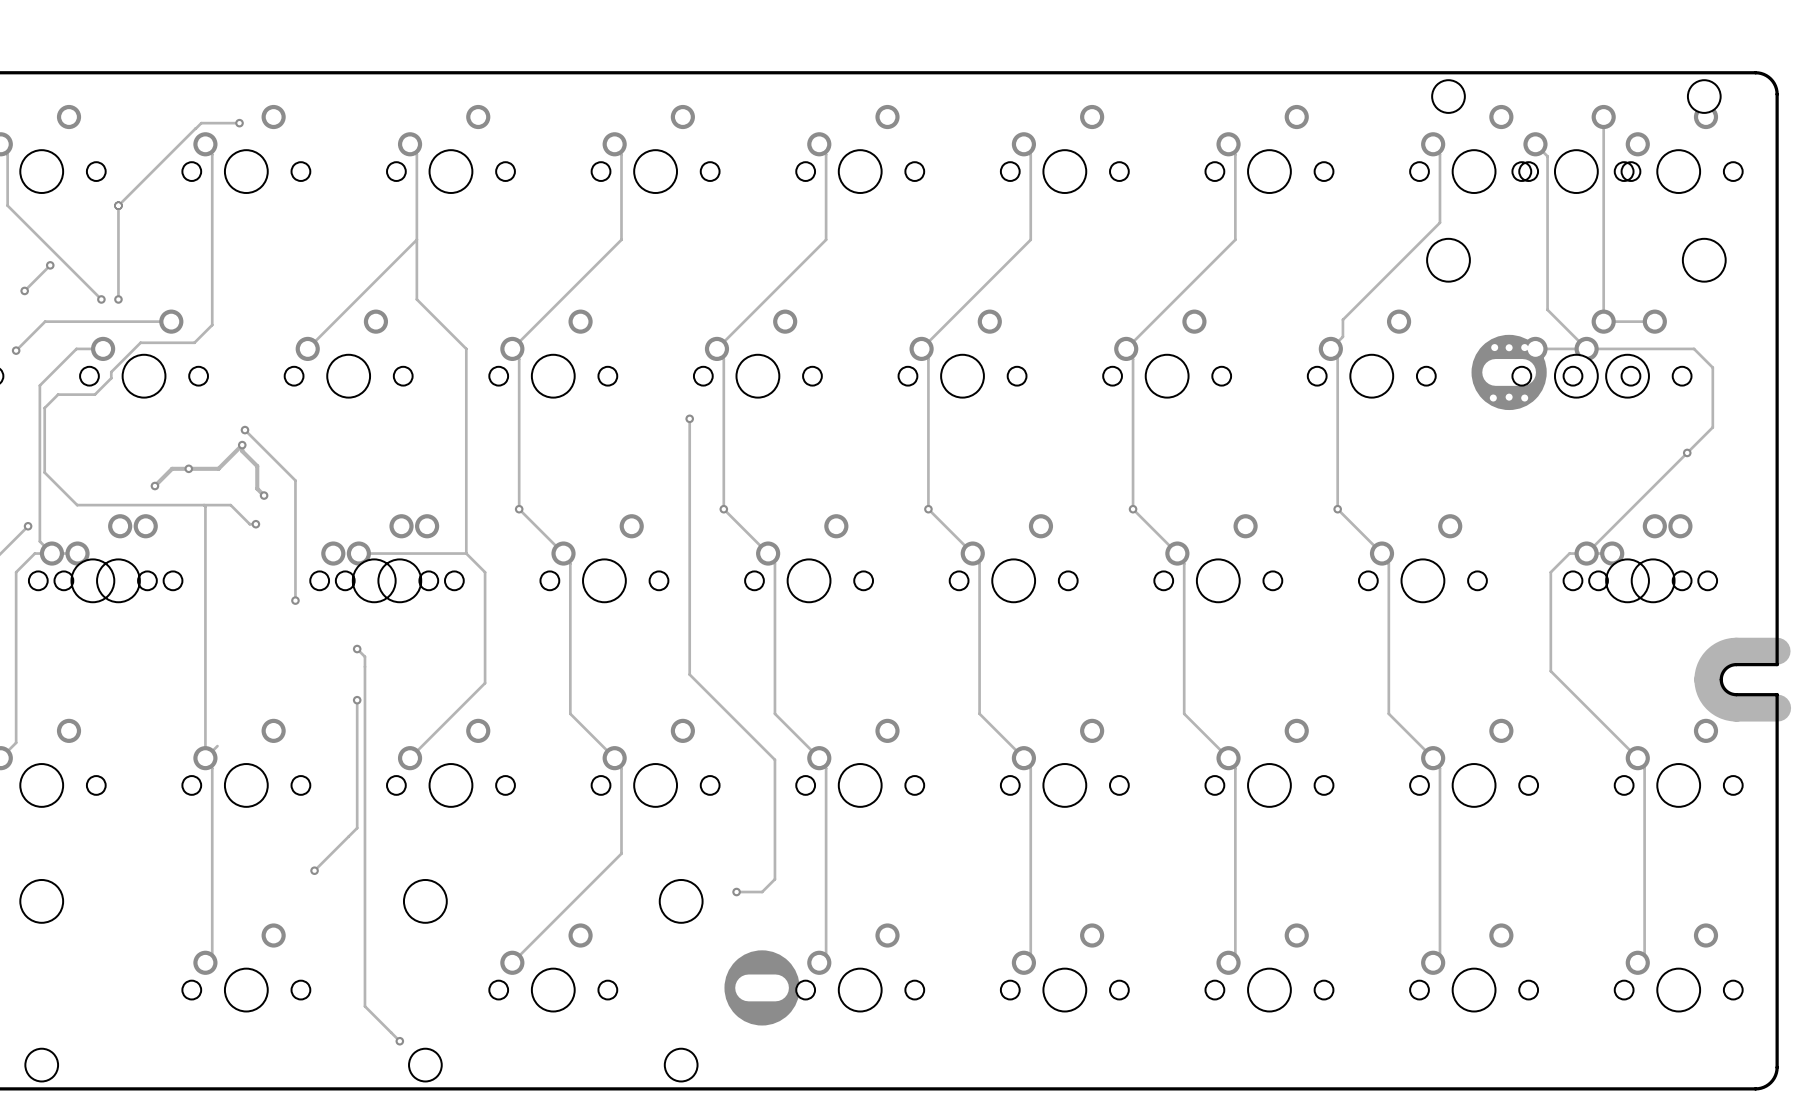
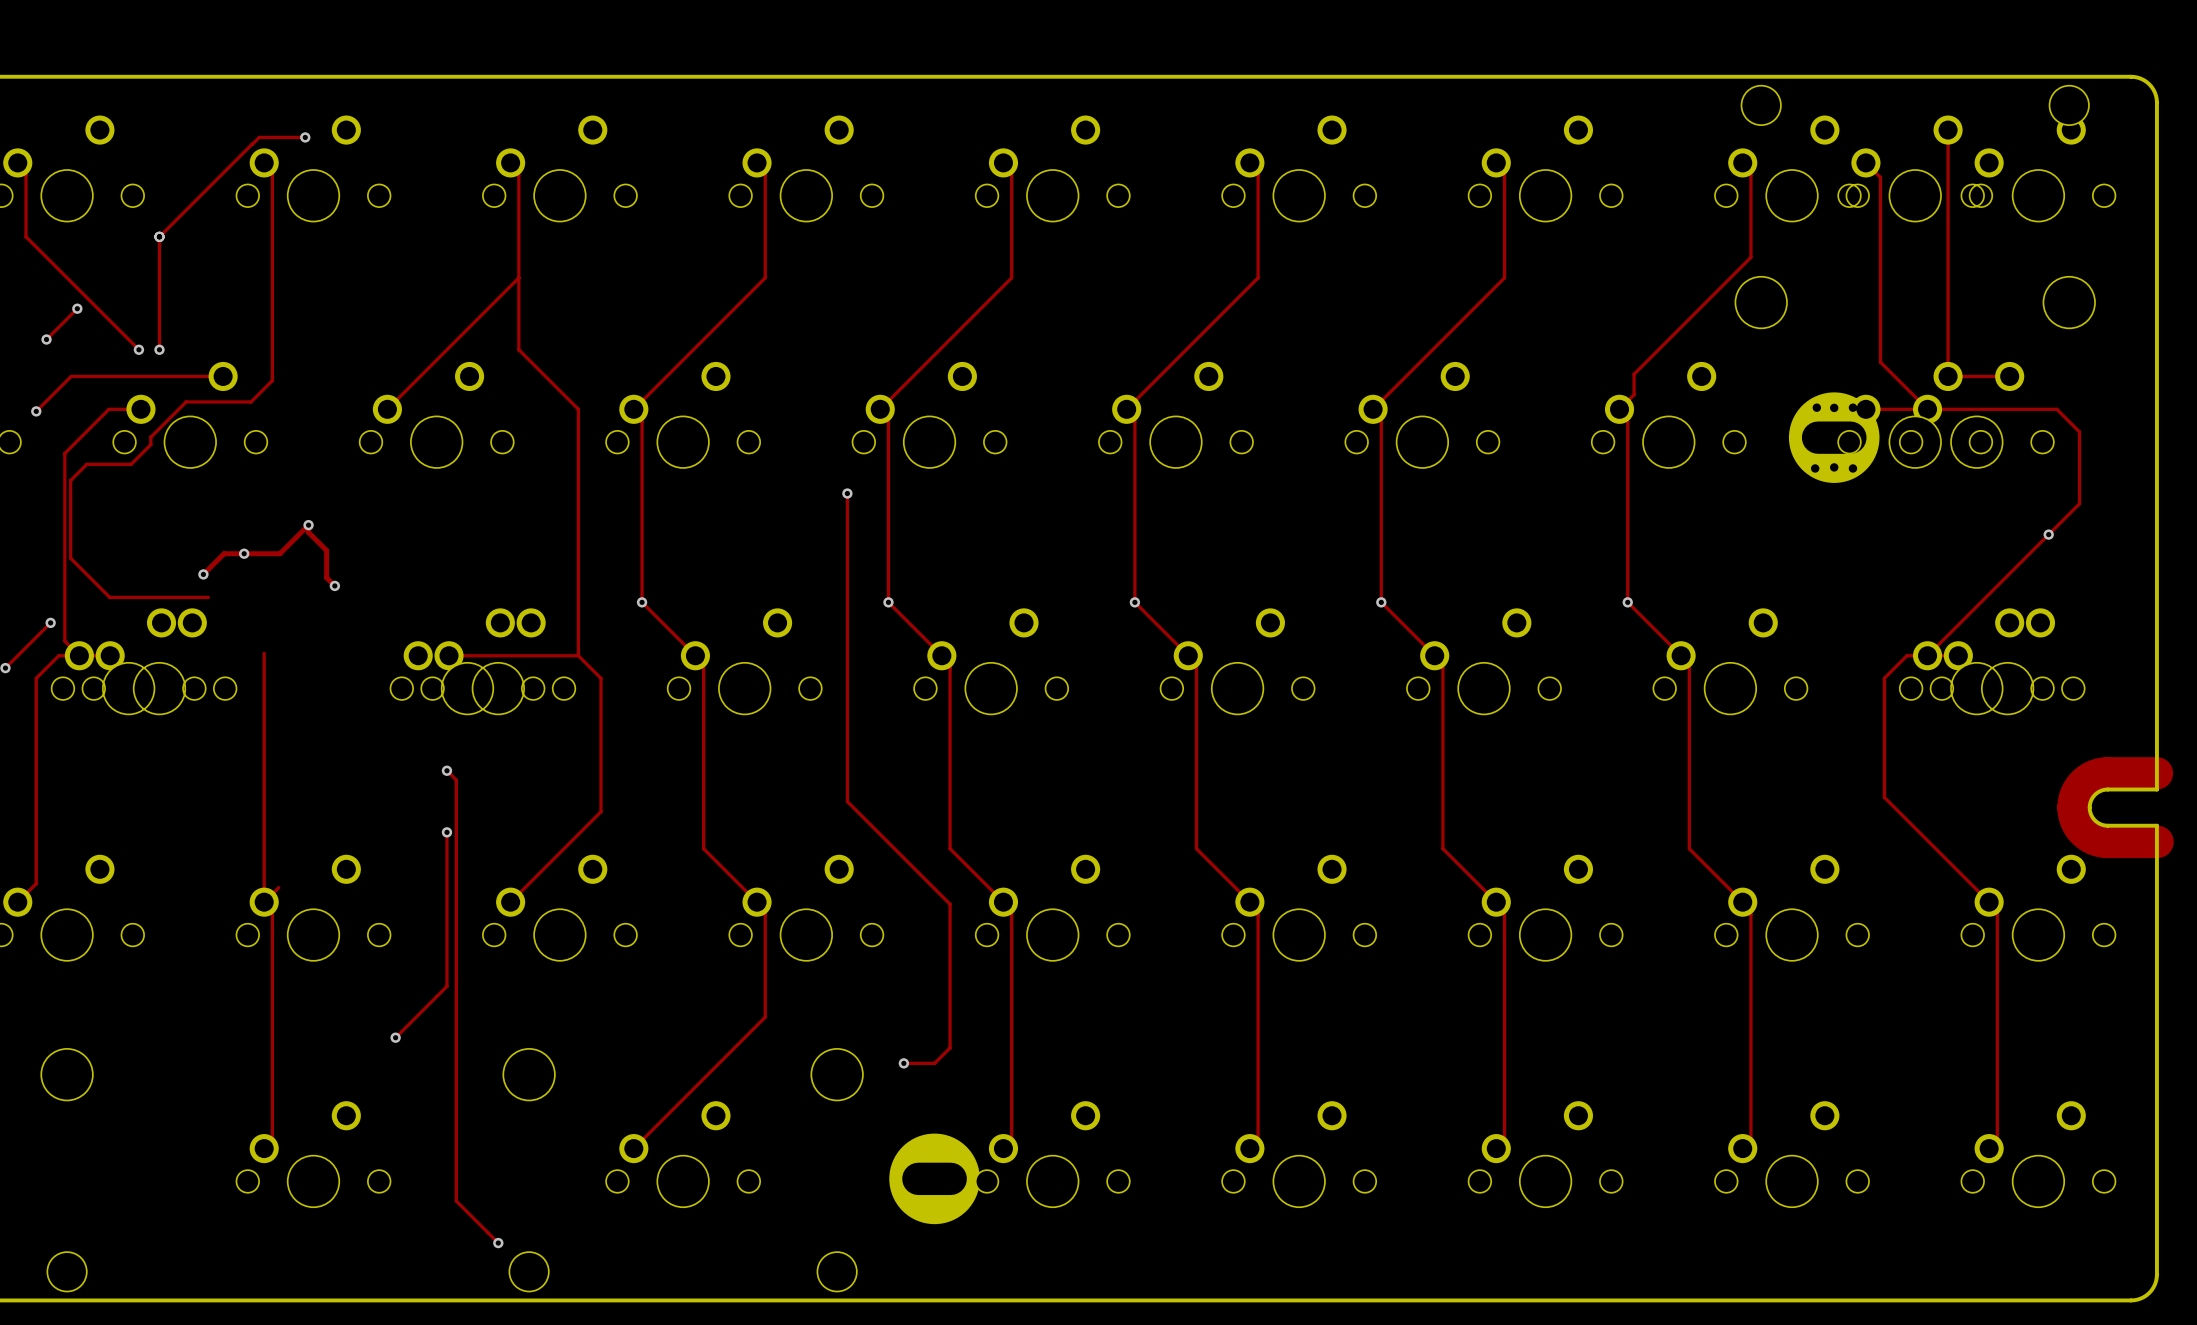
track: (244, 430) (295, 480) (295, 600) -> none
via: (244, 430) -> none
track: (159, 505) (230, 505) (249, 524) (255, 524) -> none
track: (204, 505) (205, 551) -> none
via: (255, 524) -> none
via: (295, 600) -> none

